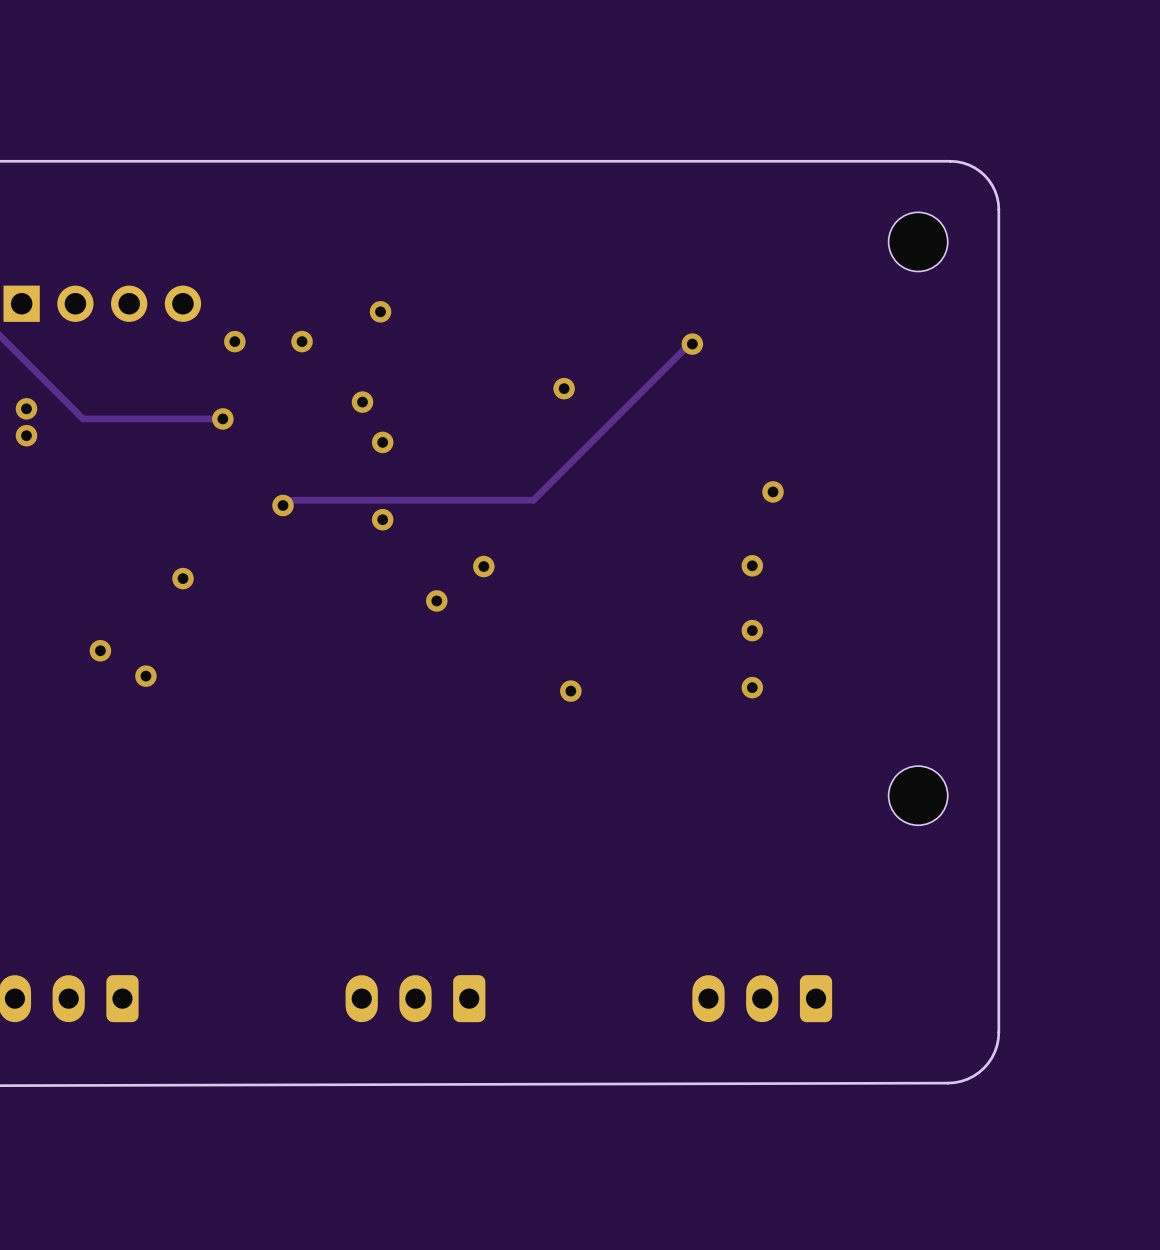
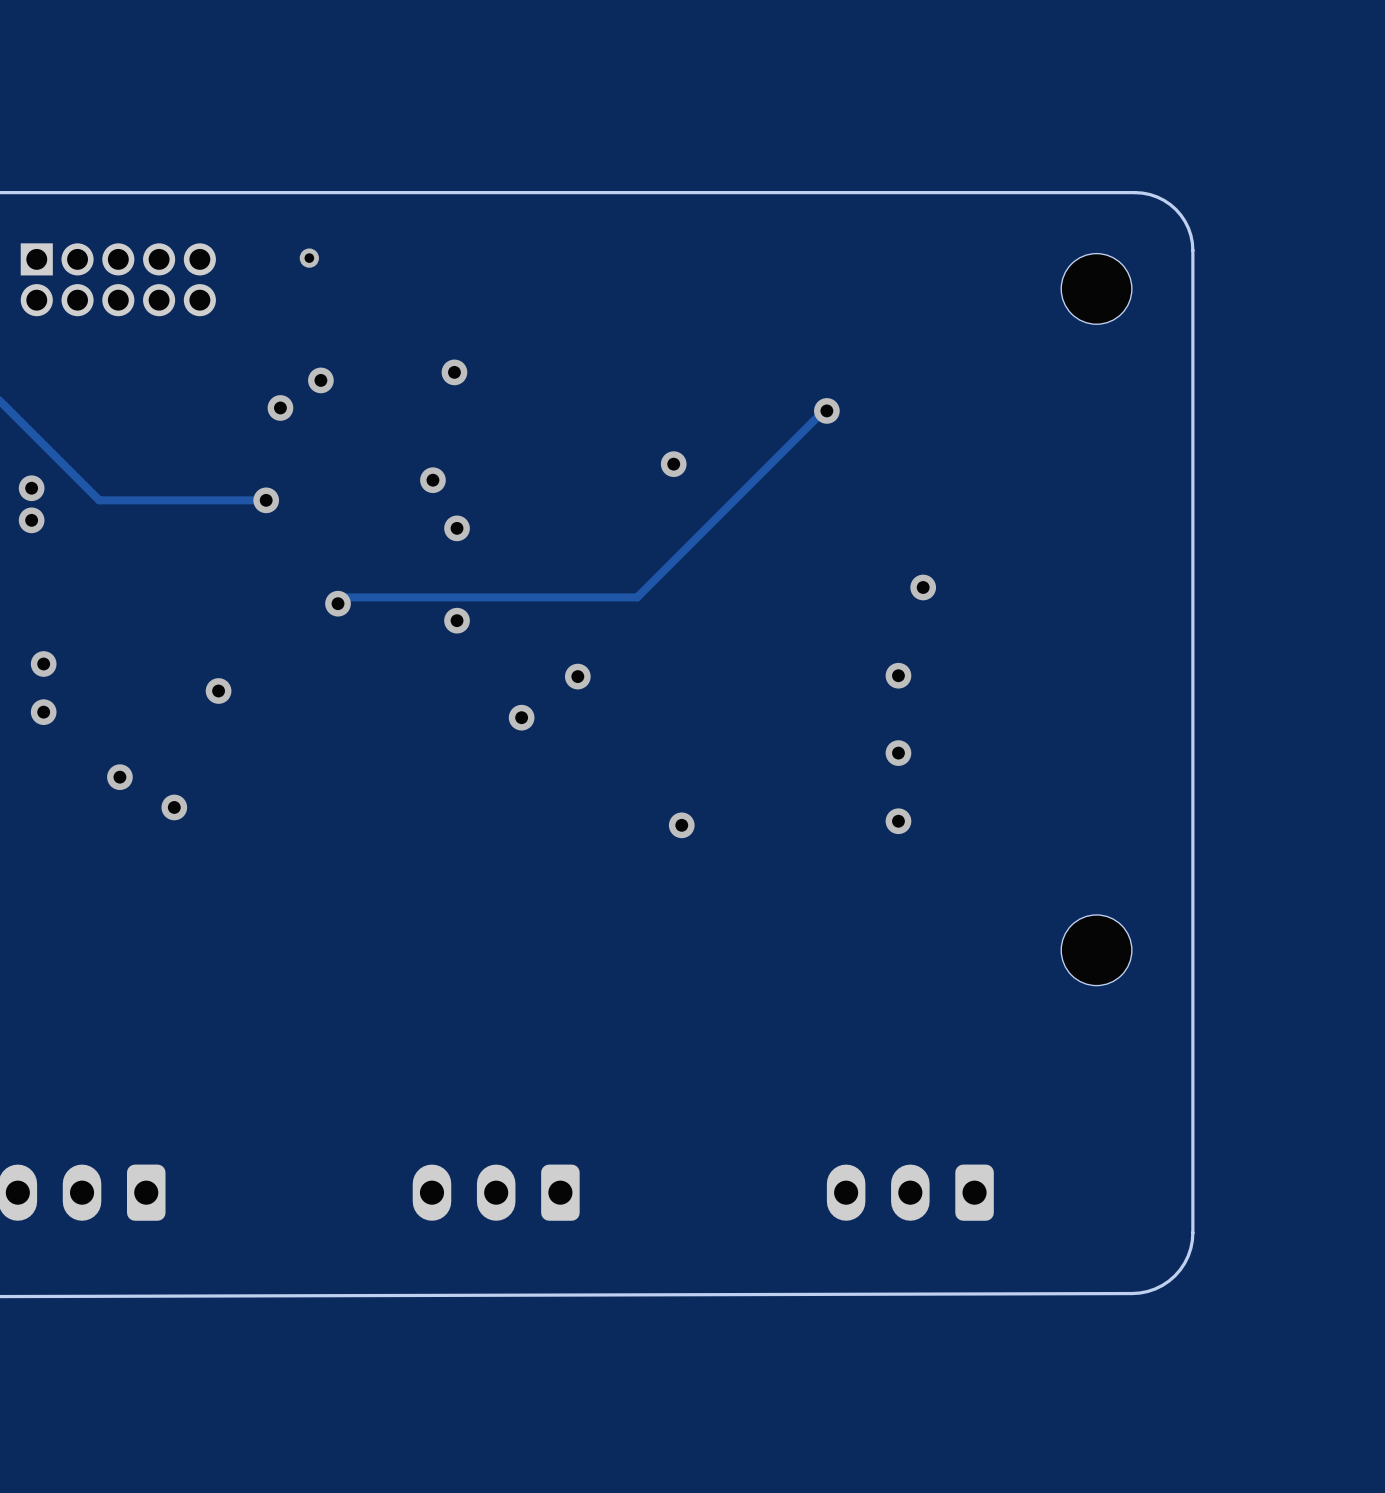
via: none -> (309, 258)
part: none -> (118, 279)
part: (102, 303) -> none
via position: (302, 341) -> (320, 380)
via: none -> (43, 664)
via: none -> (43, 712)

